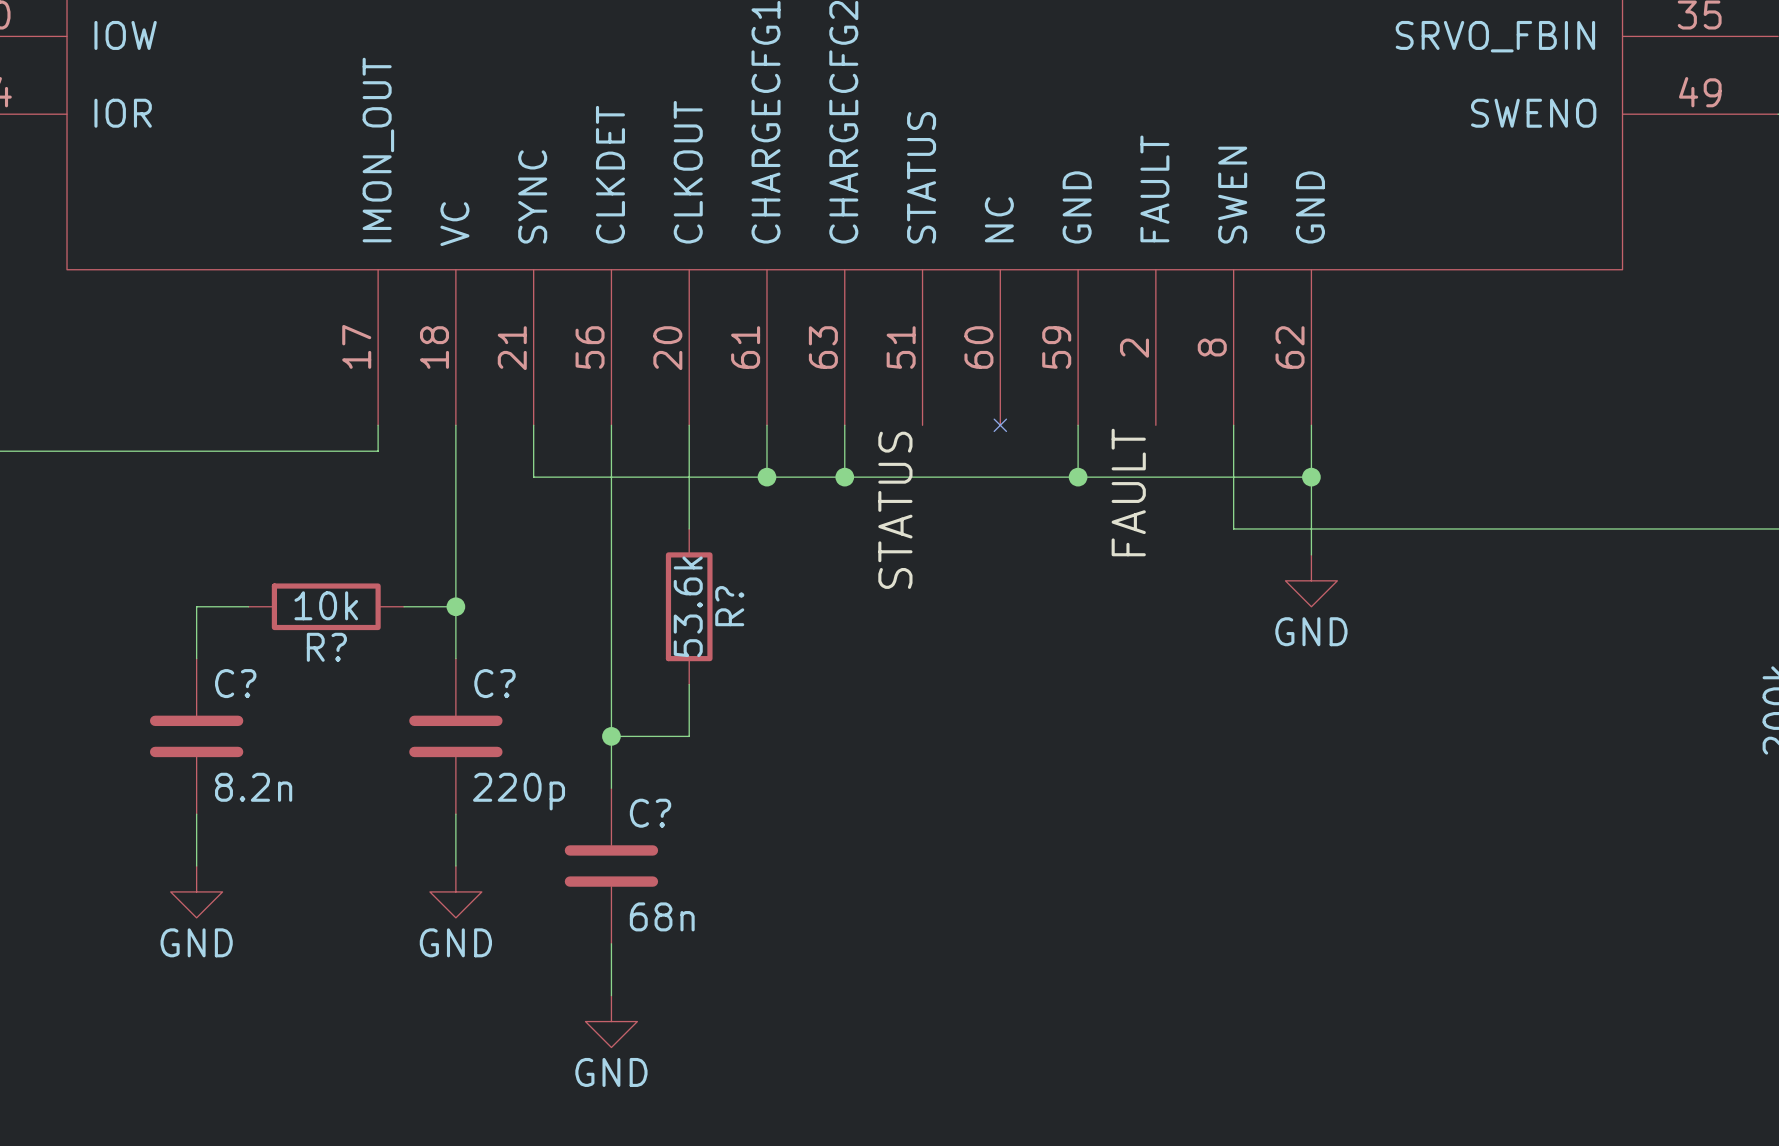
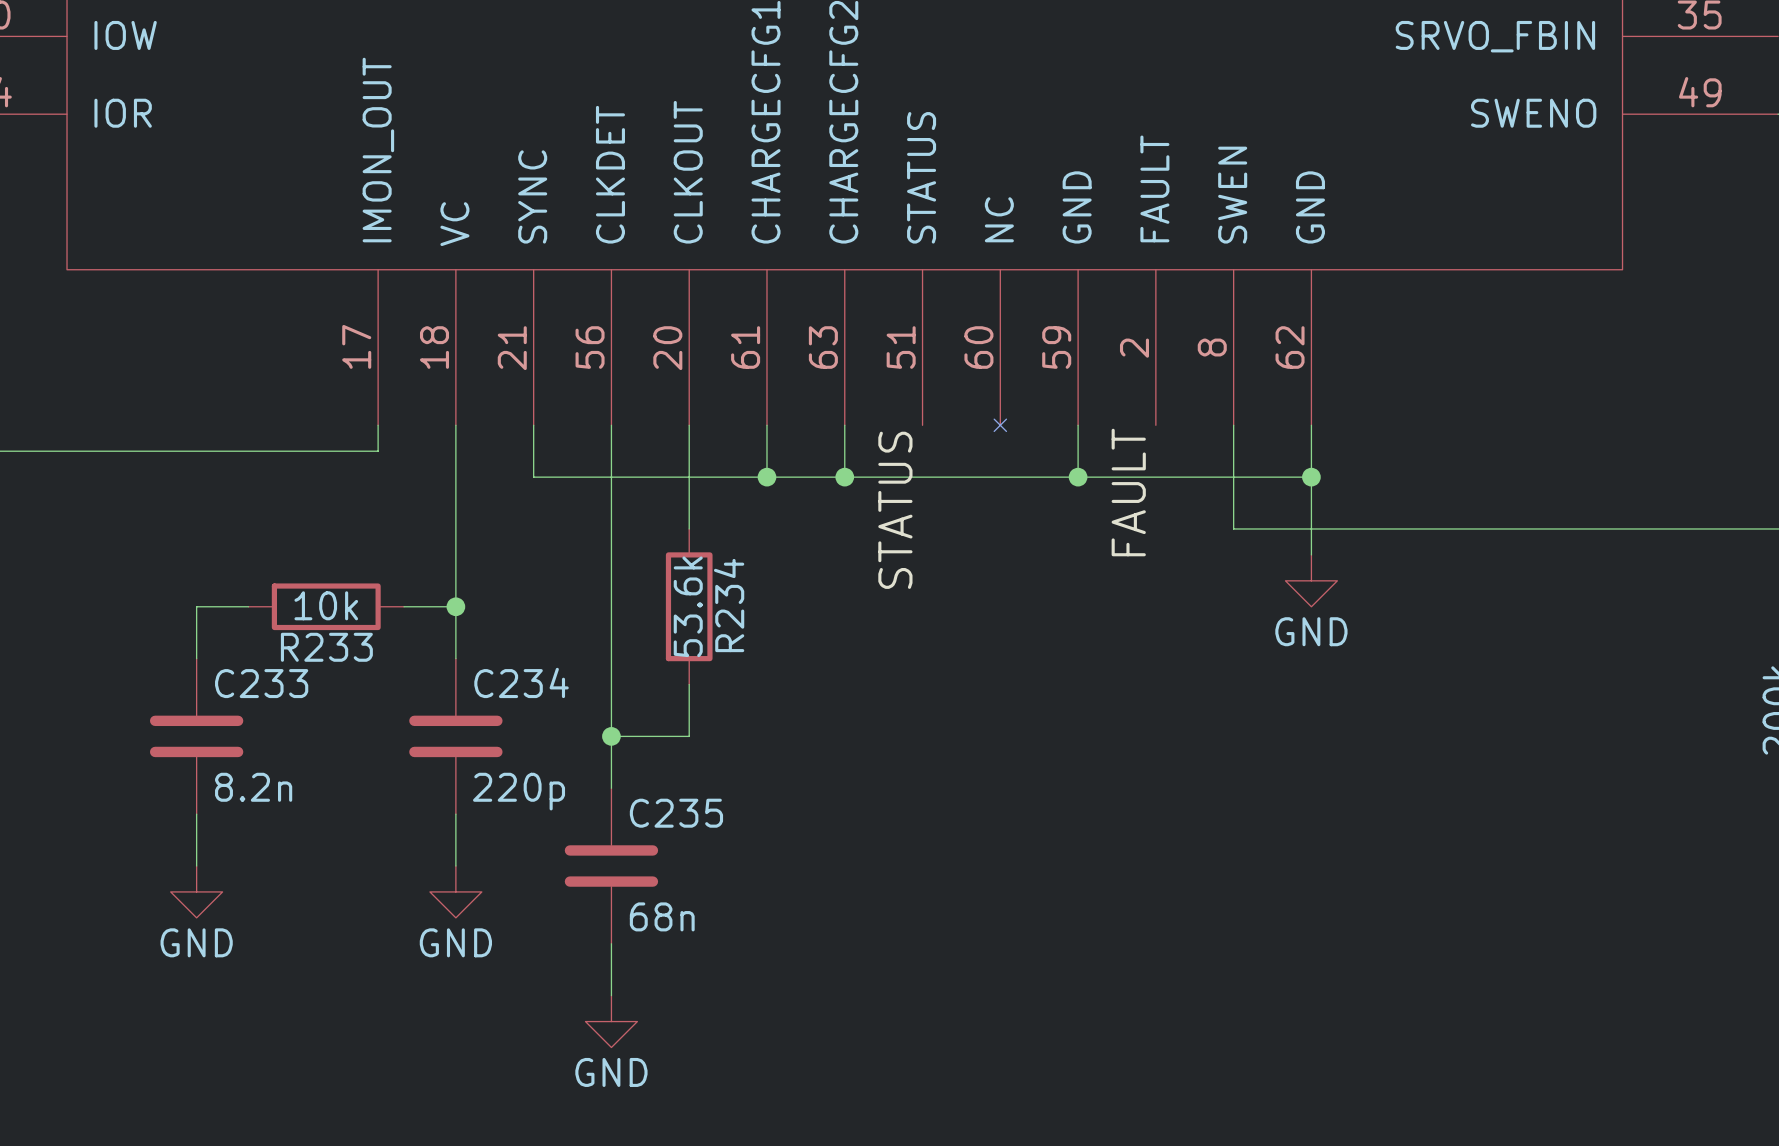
R? name: R? (729, 606) -> R234 (729, 605)
R? name: R? (326, 647) -> R233 (326, 647)
C? name: C? (235, 683) -> C233 (261, 683)
C? name: C? (494, 683) -> C234 (521, 682)
C? name: C? (650, 813) -> C235 (676, 813)

